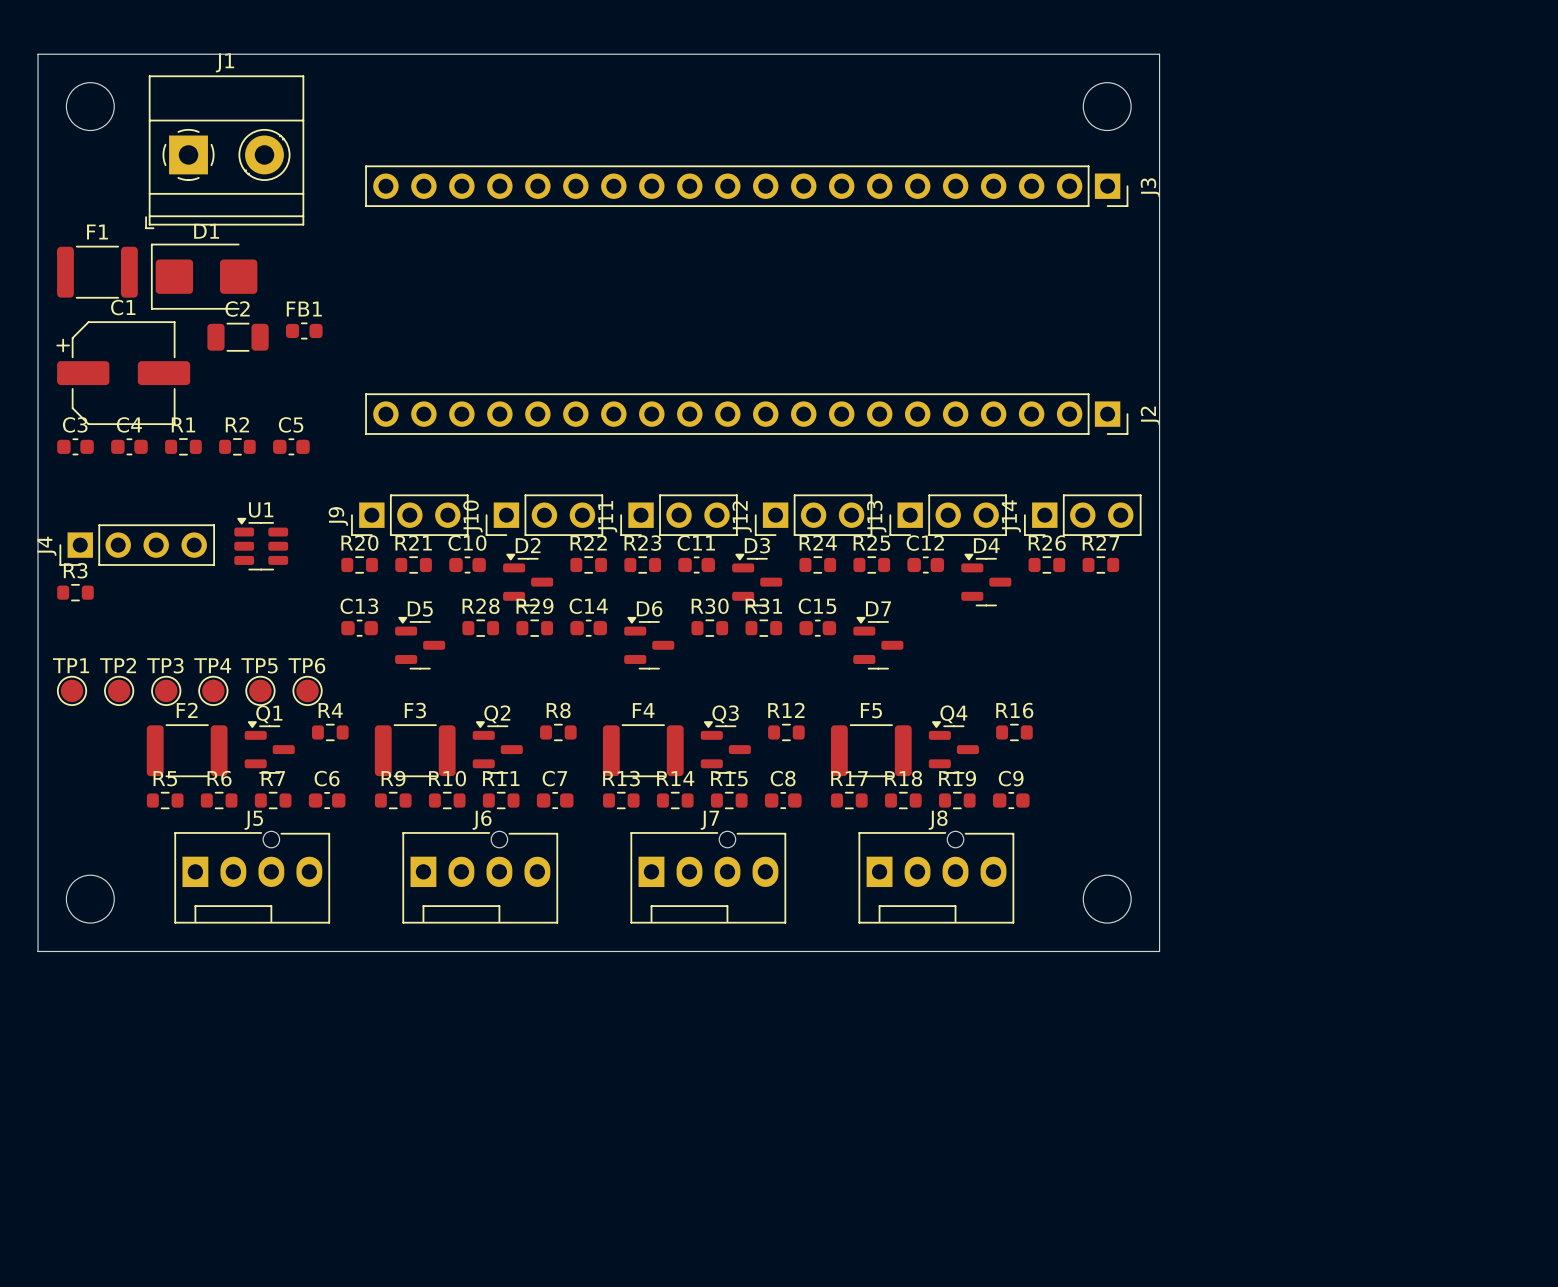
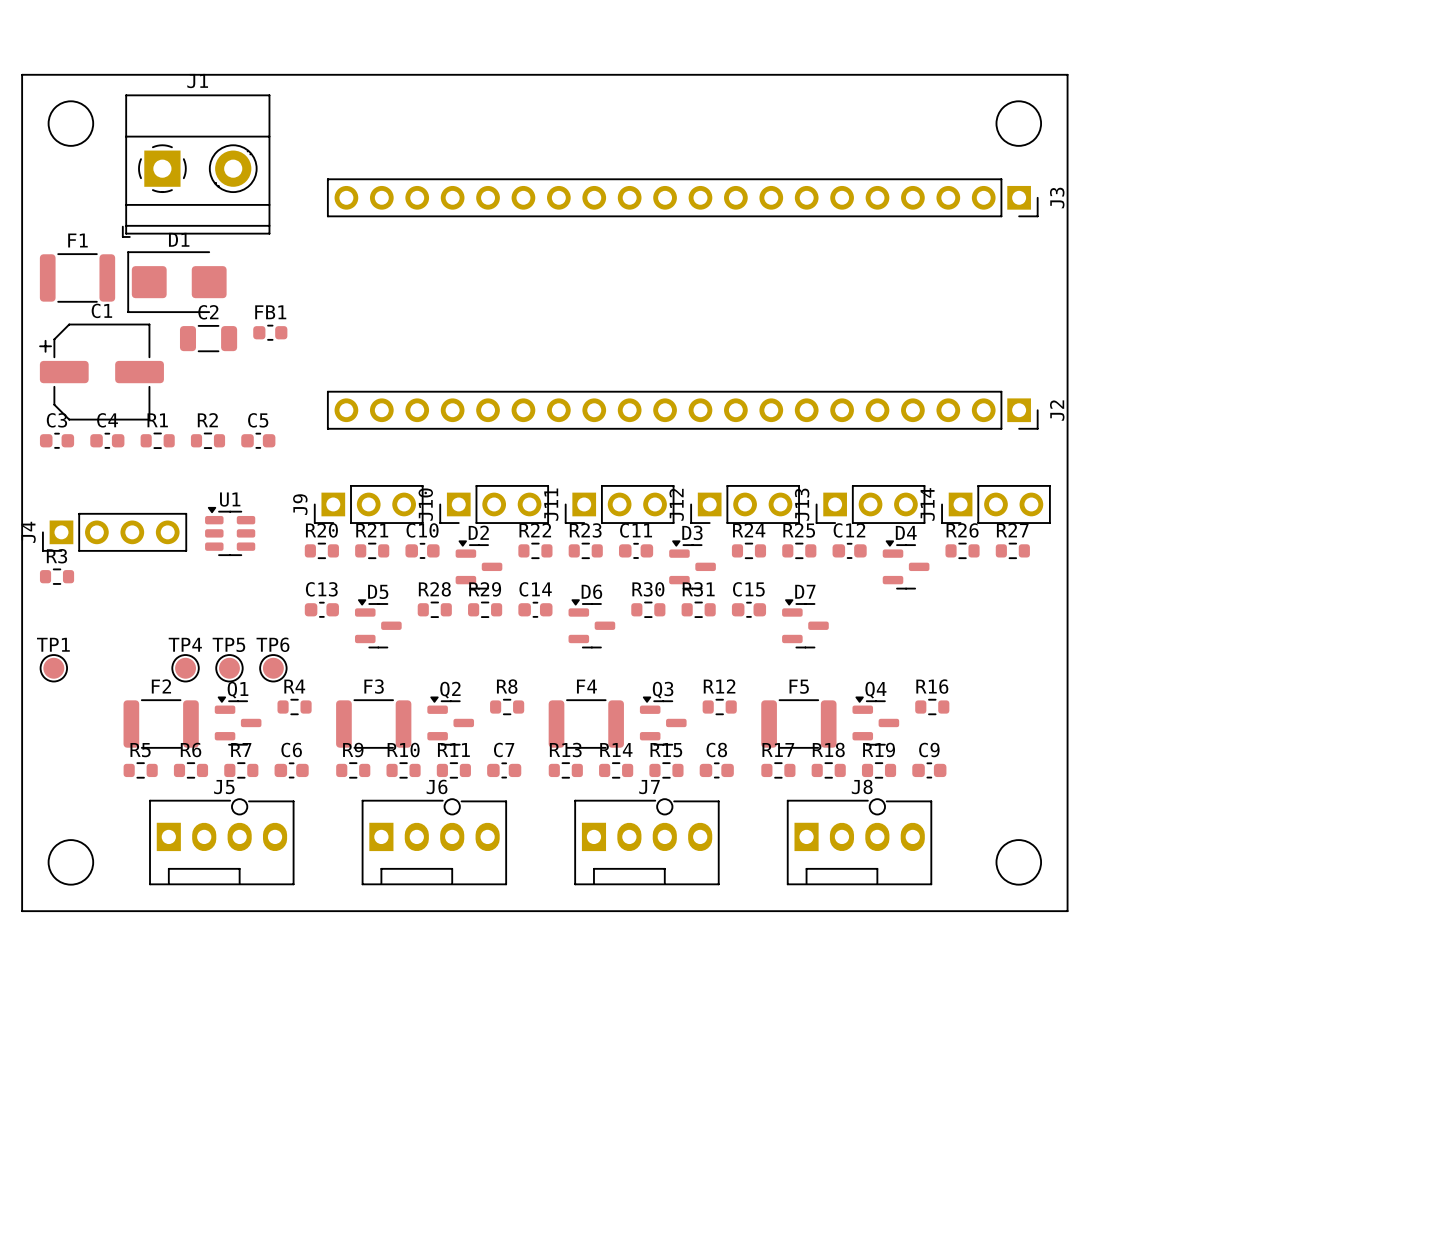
TP2: (119, 690) -> none
TP3: (166, 690) -> none

